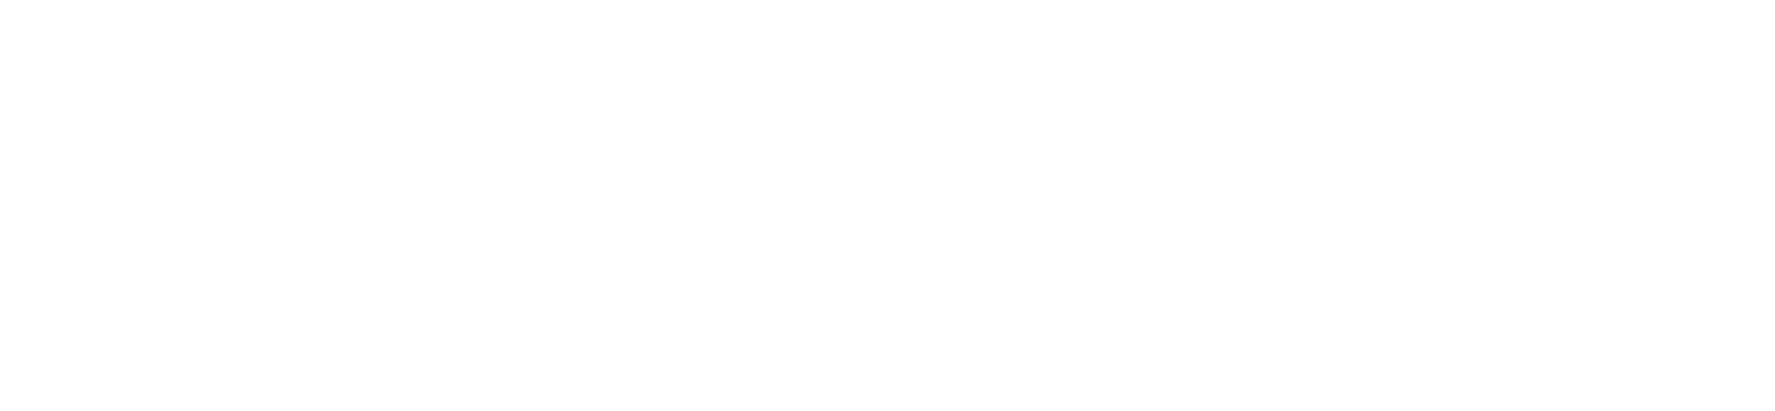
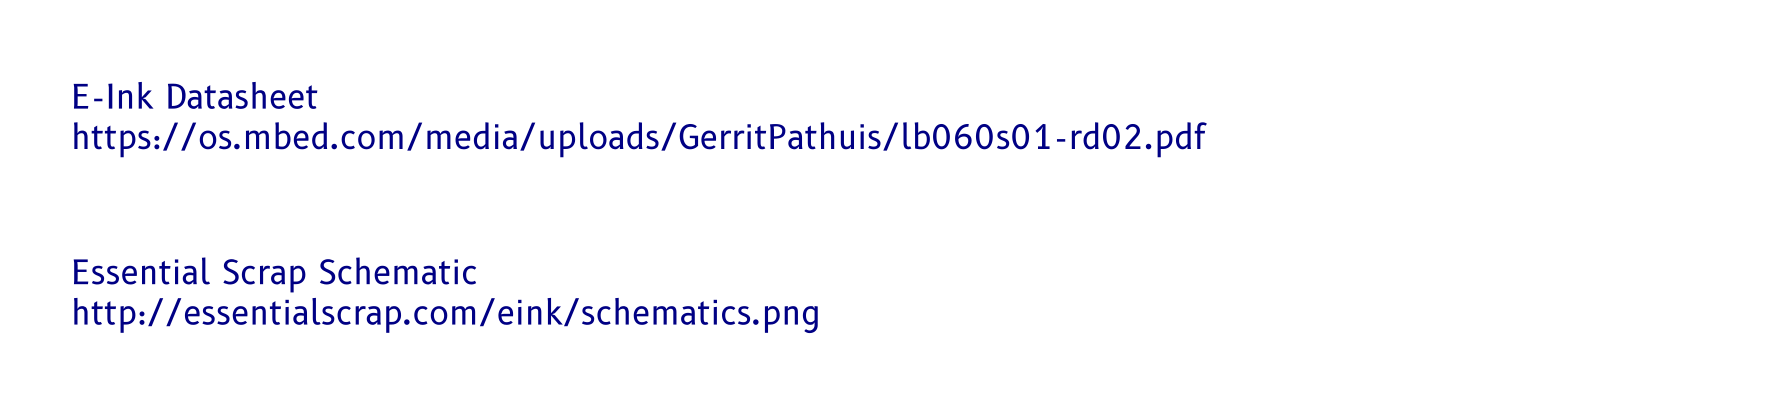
text: none -> E-Ink Datasheet (195, 95)
text: none -> https://os.mbed.com/media/uploads/GerritPathuis/lb060s01-rd02.pdf (640, 139)
text: none -> Essential Scrap Schematic (274, 274)
text: none -> http://essentialscrap.com/eink/schematics.png (445, 315)

